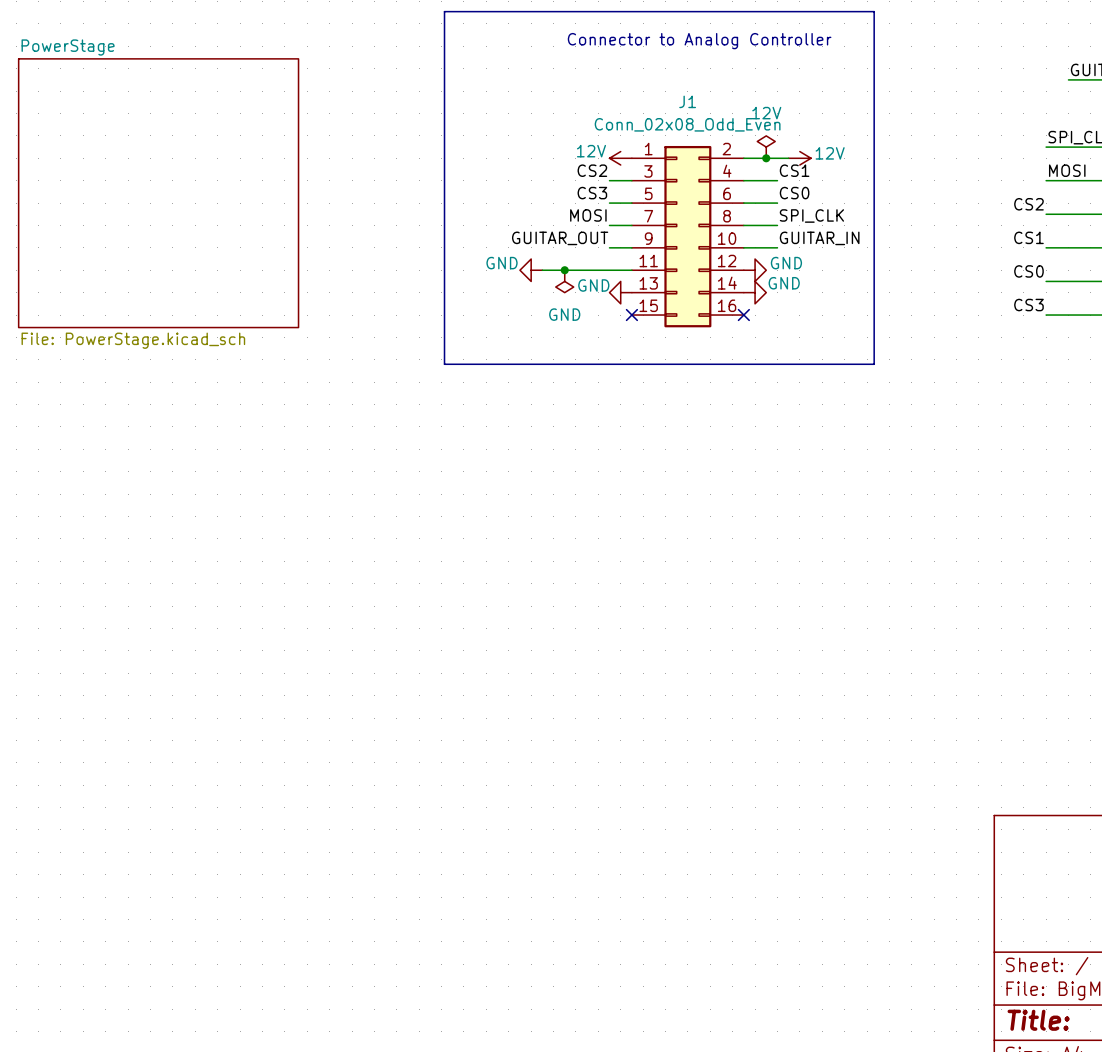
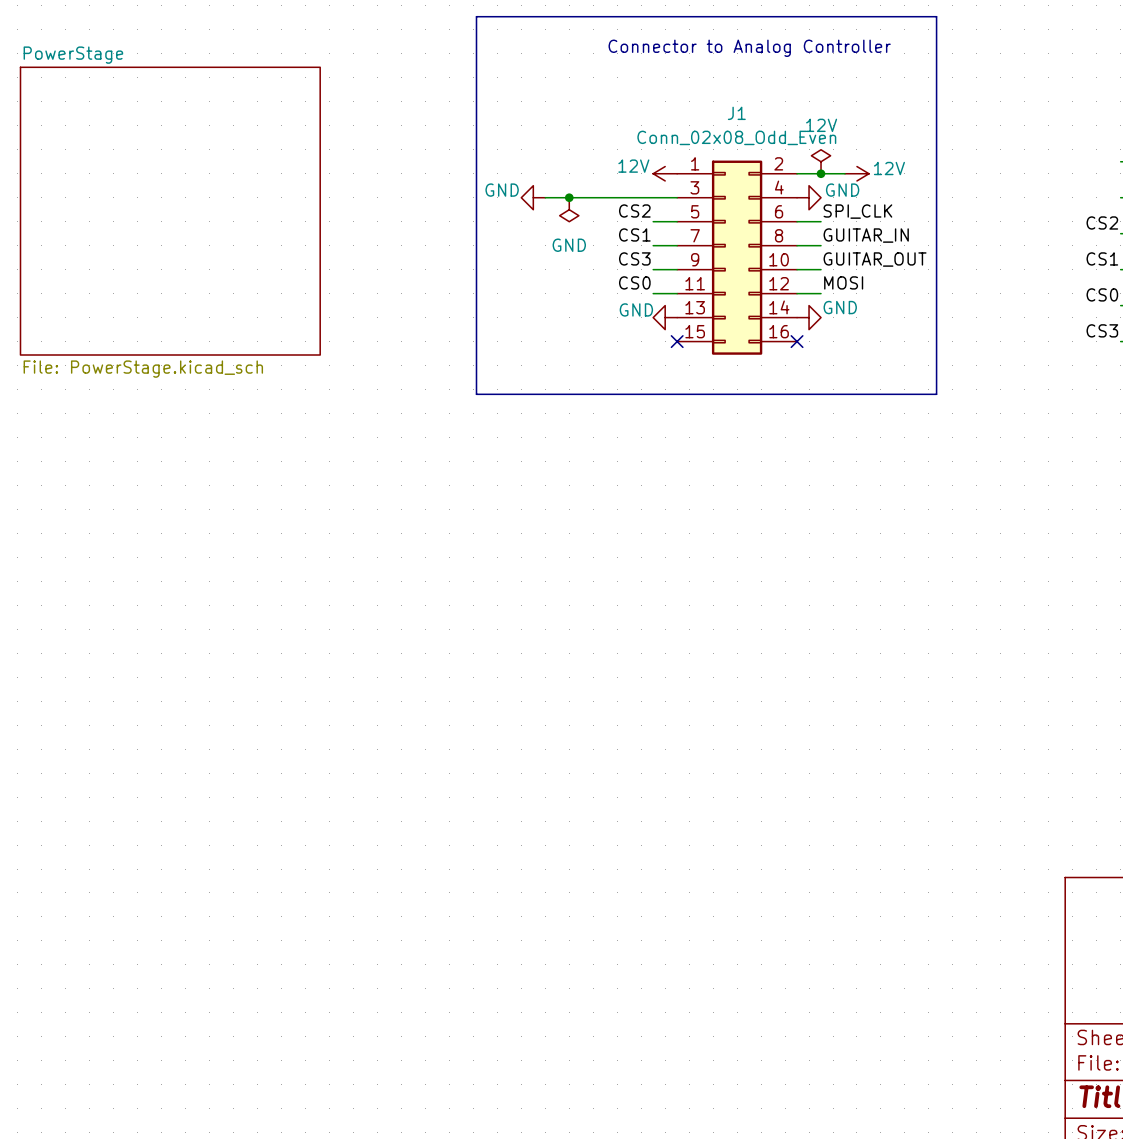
label: CS2 (592, 170) -> none
label: CS1 (794, 170) -> none
wire: none -> (545, 197) (653, 197)
junction: none -> (569, 197)
wire: (743, 180) (777, 180) -> none
label: CS3 (592, 193) -> CS2 (634, 211)
label position: CS0 (794, 193) -> CS0 (634, 282)
wire: (766, 203) (777, 203) -> none
label: MOSI (588, 215) -> CS1 (634, 234)
label position: SPI_CLK (811, 216) -> SPI_CLK (857, 211)
wire: (766, 225) (777, 225) -> none
label: GUITAR_OUT (560, 238) -> CS3 (634, 258)
label: none -> GUITAR_OUT (875, 259)
label position: GUITAR_IN (819, 238) -> GUITAR_IN (866, 235)
wire: (766, 247) (777, 247) -> none
label: none -> MOSI (843, 282)
power symbol position: GND (531, 270) -> GND (533, 197)
wire: (542, 270) (609, 270) -> none
junction: (564, 270) -> none
power symbol position: GND (755, 270) -> GND (809, 197)
power symbol position: GND (564, 281) -> GND (569, 209)

